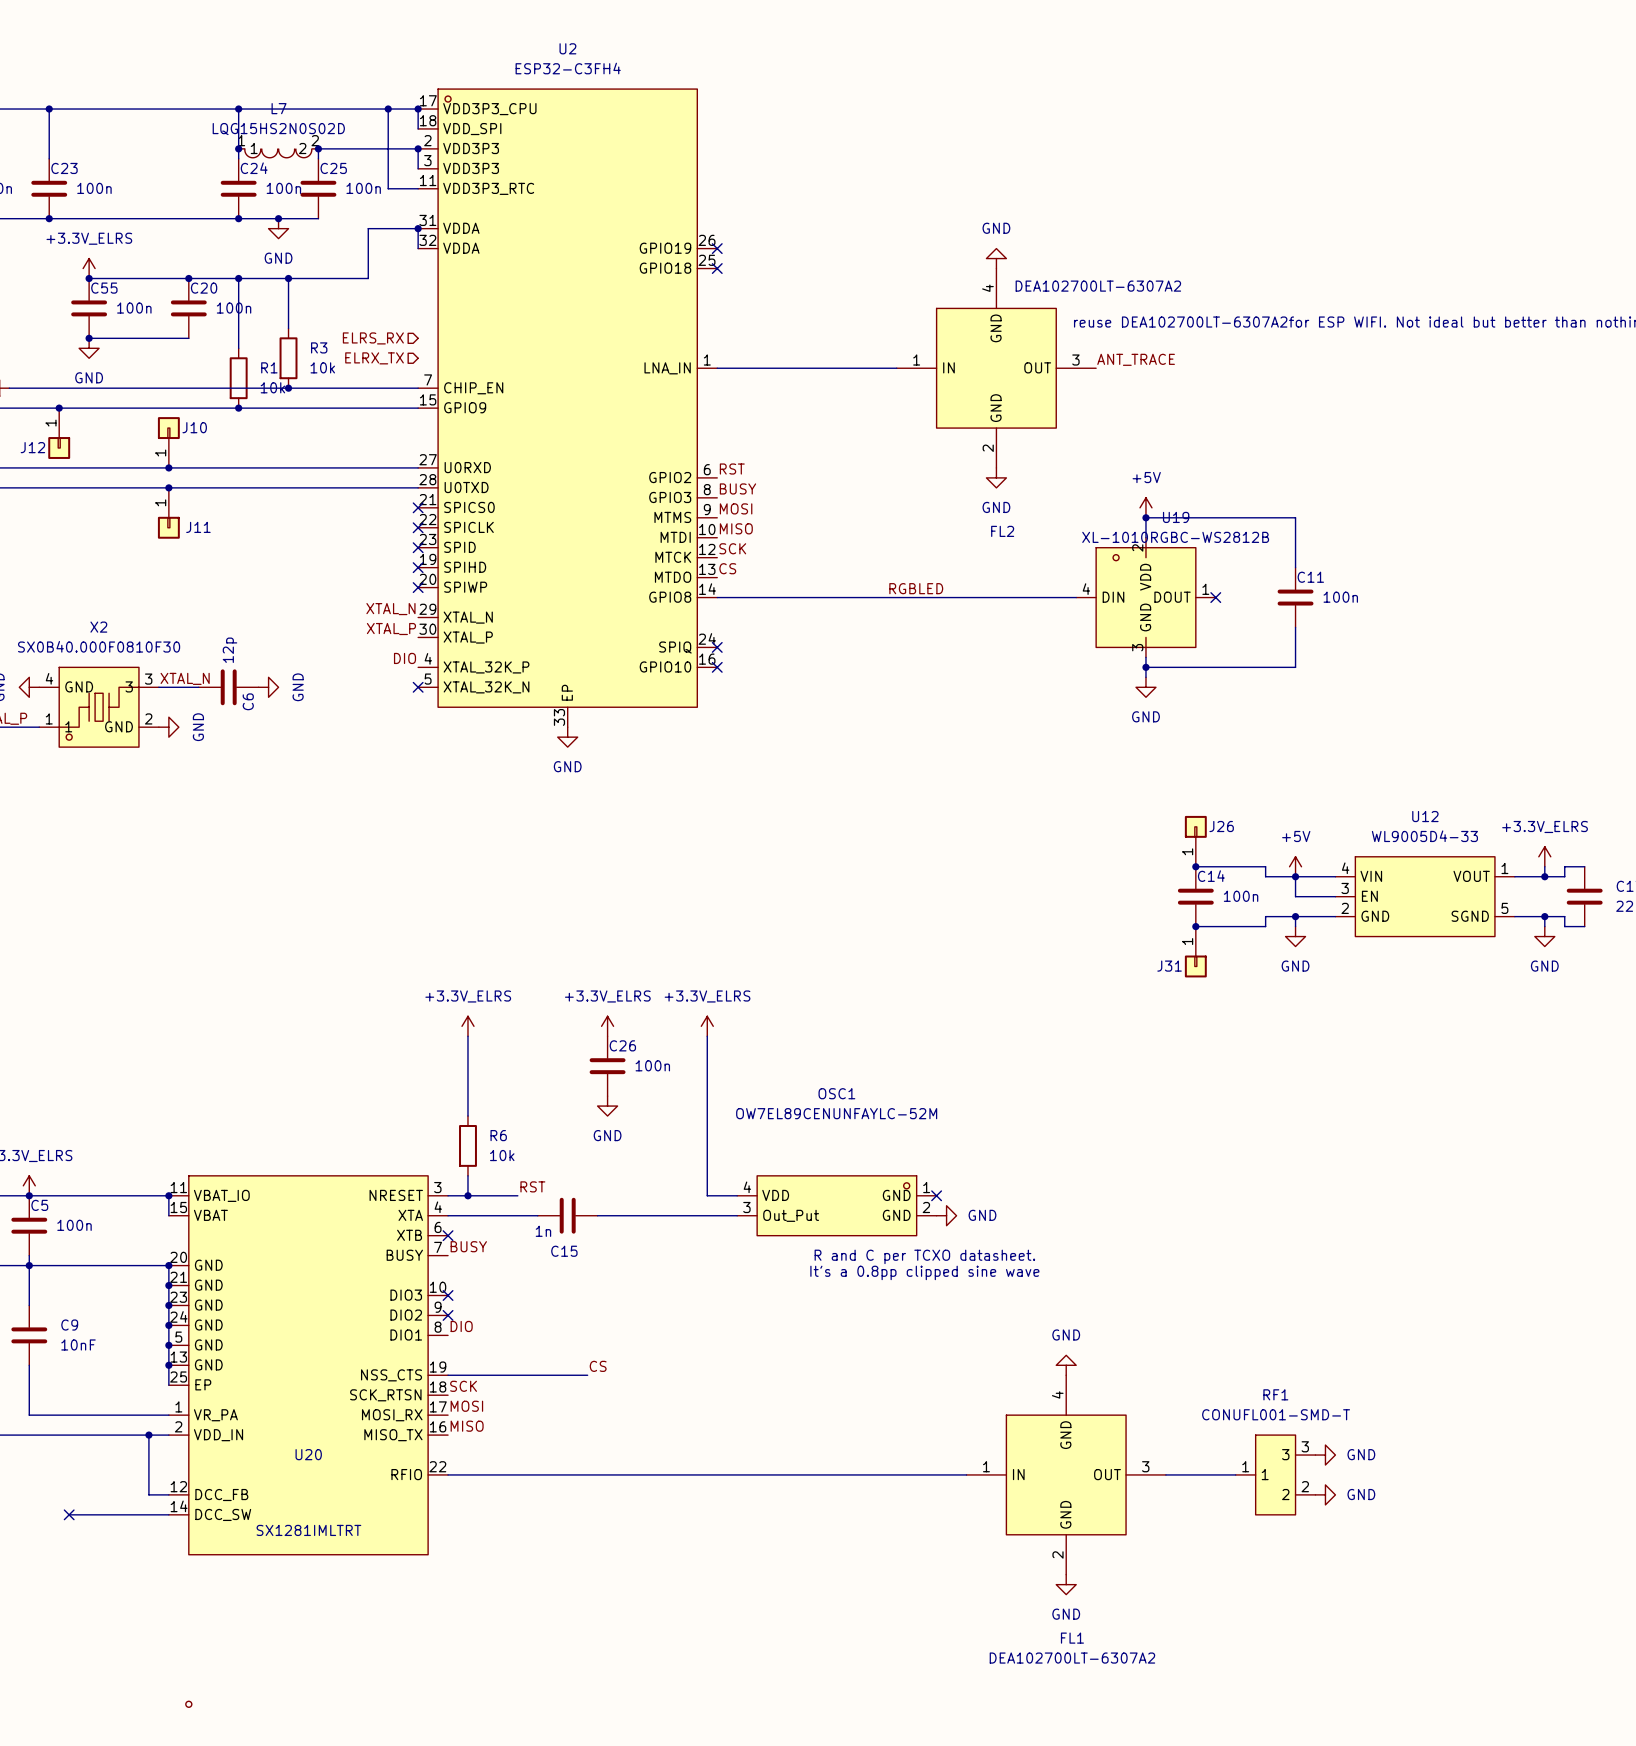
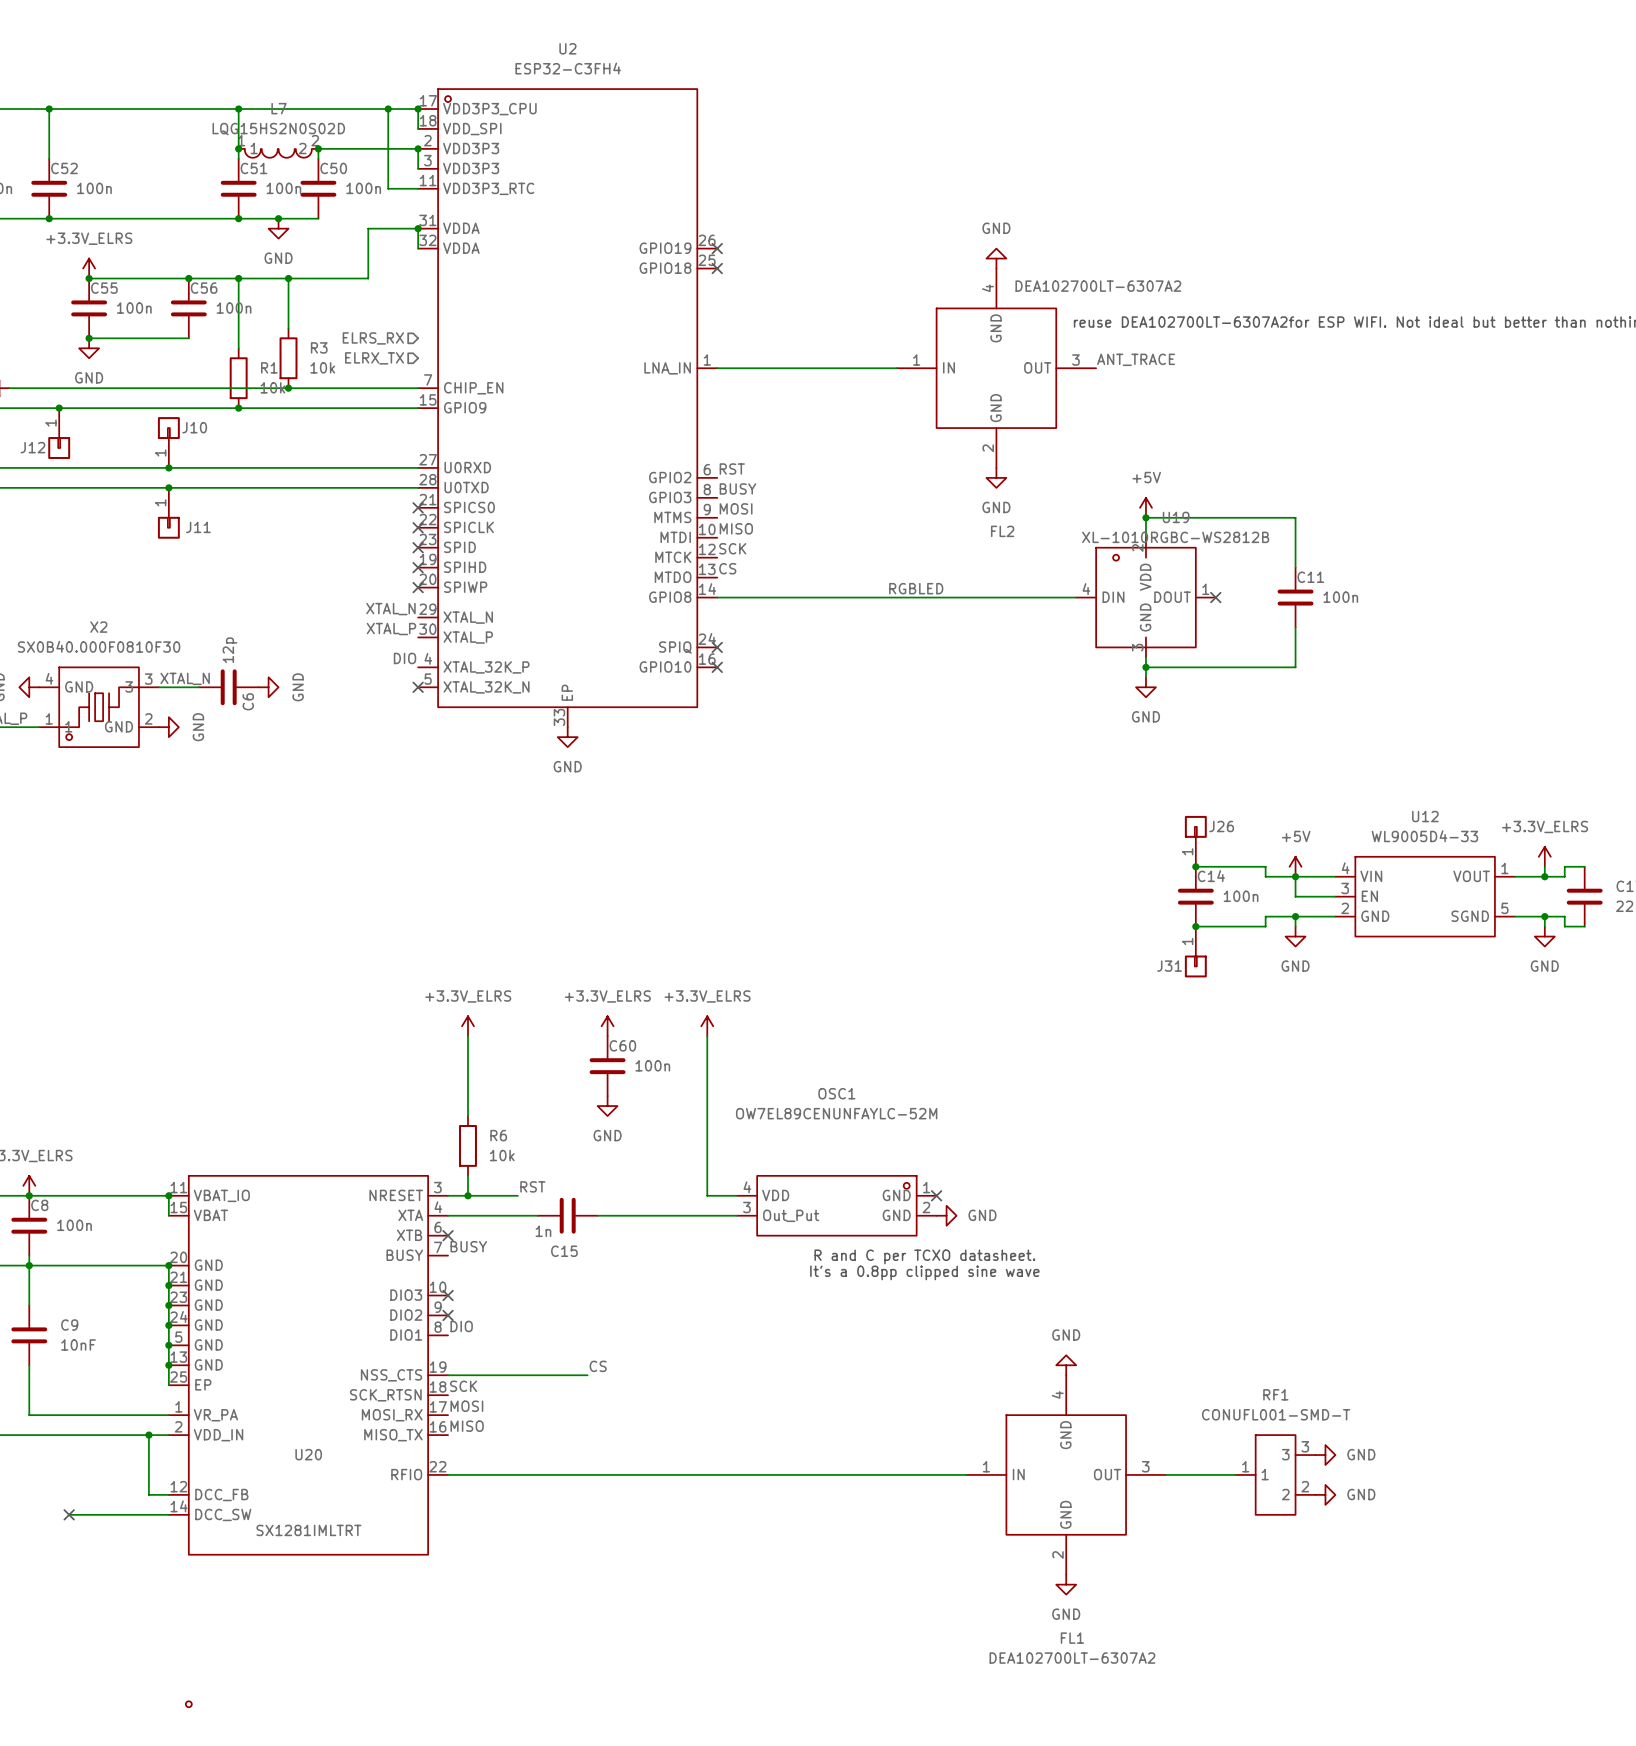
C23 name: C23 (64, 168) -> C52 (64, 168)
C24 name: C24 (254, 168) -> C51 (253, 168)
C25 name: C25 (333, 168) -> C50 (333, 168)
C20 name: C20 (204, 288) -> C56 (204, 288)
C26 name: C26 (622, 1045) -> C60 (622, 1045)
C5 name: C5 (39, 1205) -> C8 (39, 1205)

